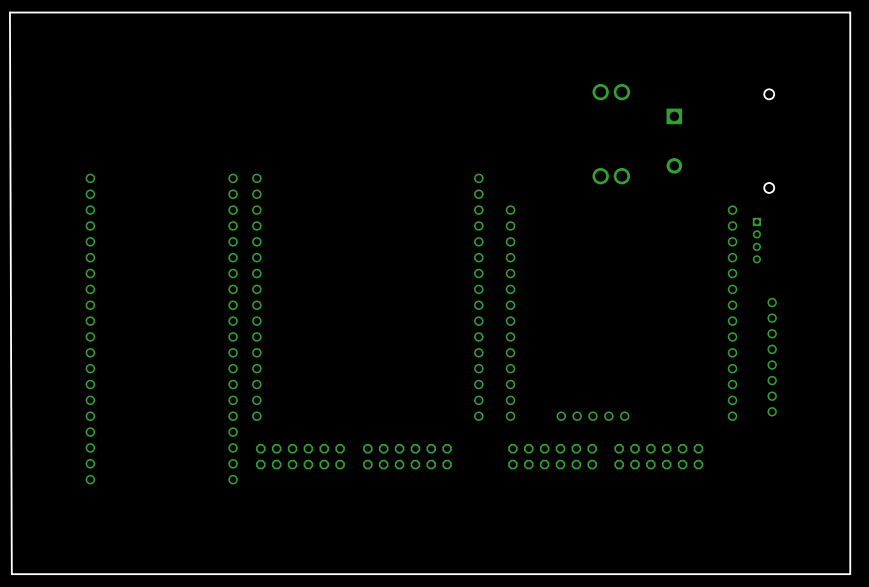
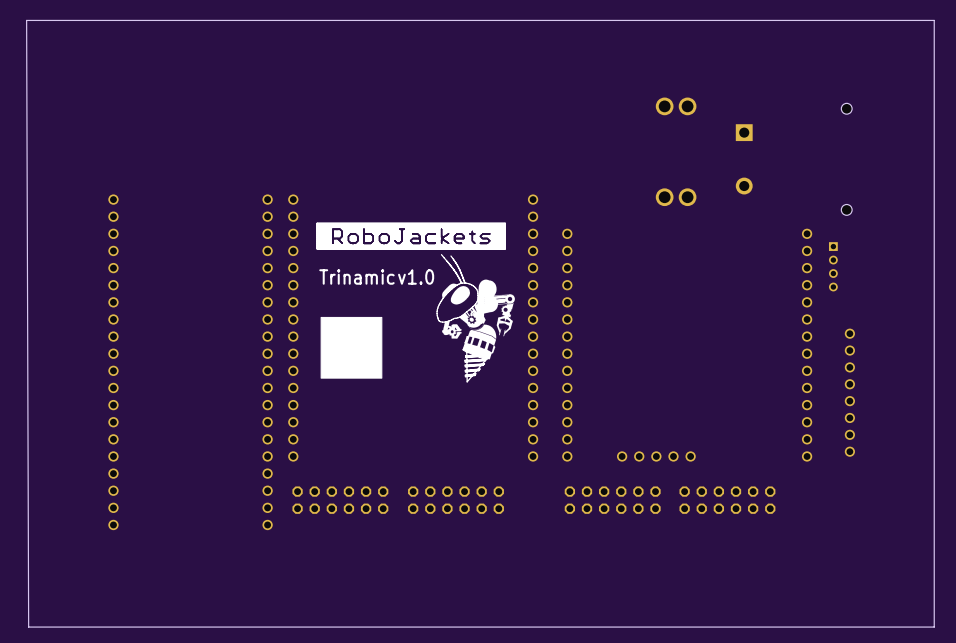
drawing: none -> [316, 222, 515, 383]
text: none -> Trinamic (356, 276)
text: none -> v1.0 (416, 276)
drawing: none -> [320, 316, 383, 379]

